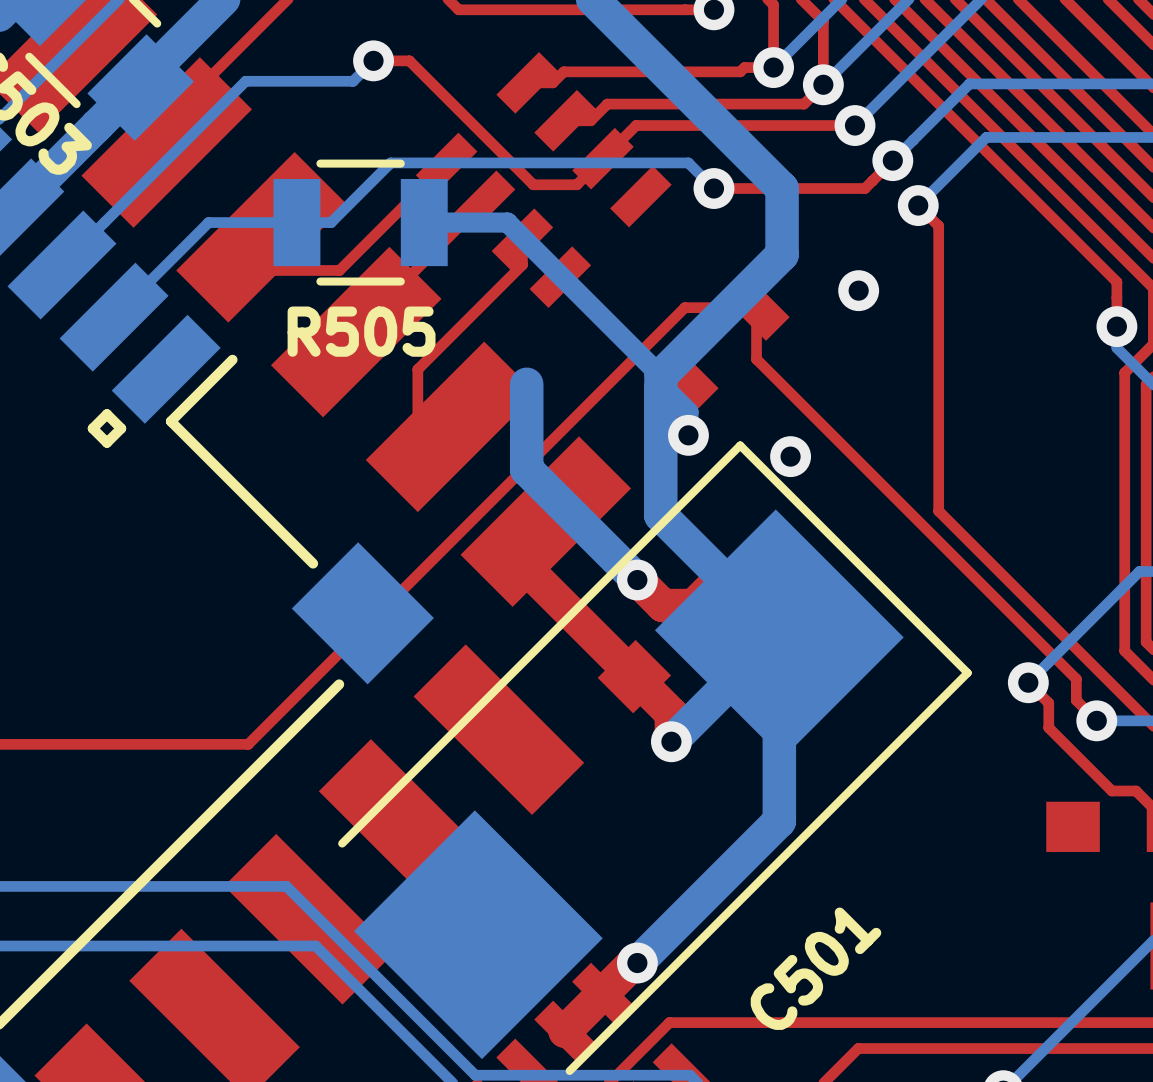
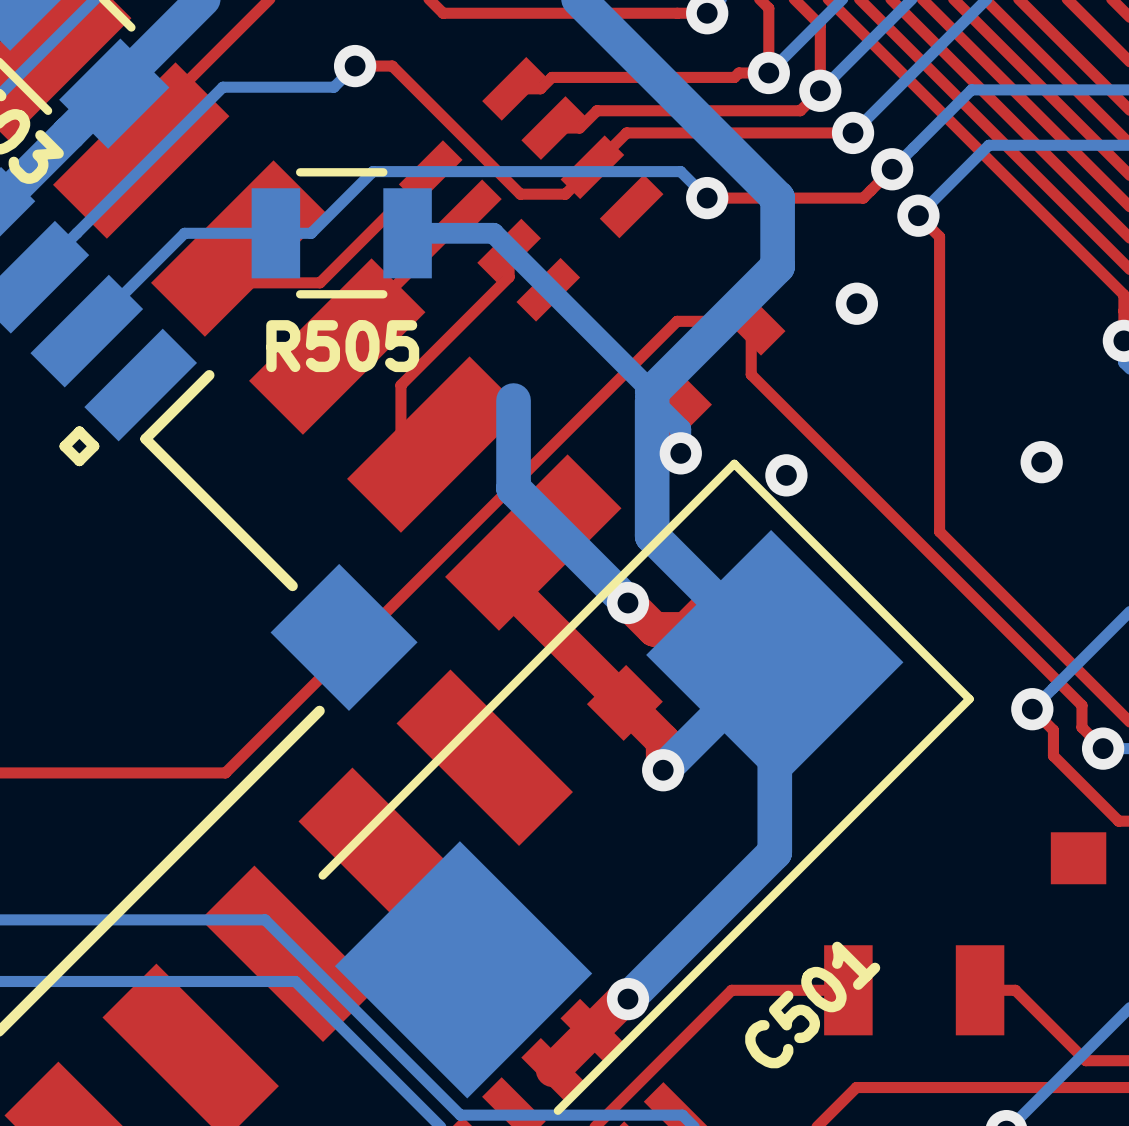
via: none -> (1041, 462)
part: none -> (914, 990)
top track: none -> (980, 990) (1015, 990) (1085, 1060)
top track: (1080, 1022) (669, 1022) -> (848, 990) (731, 990) (661, 1060)

